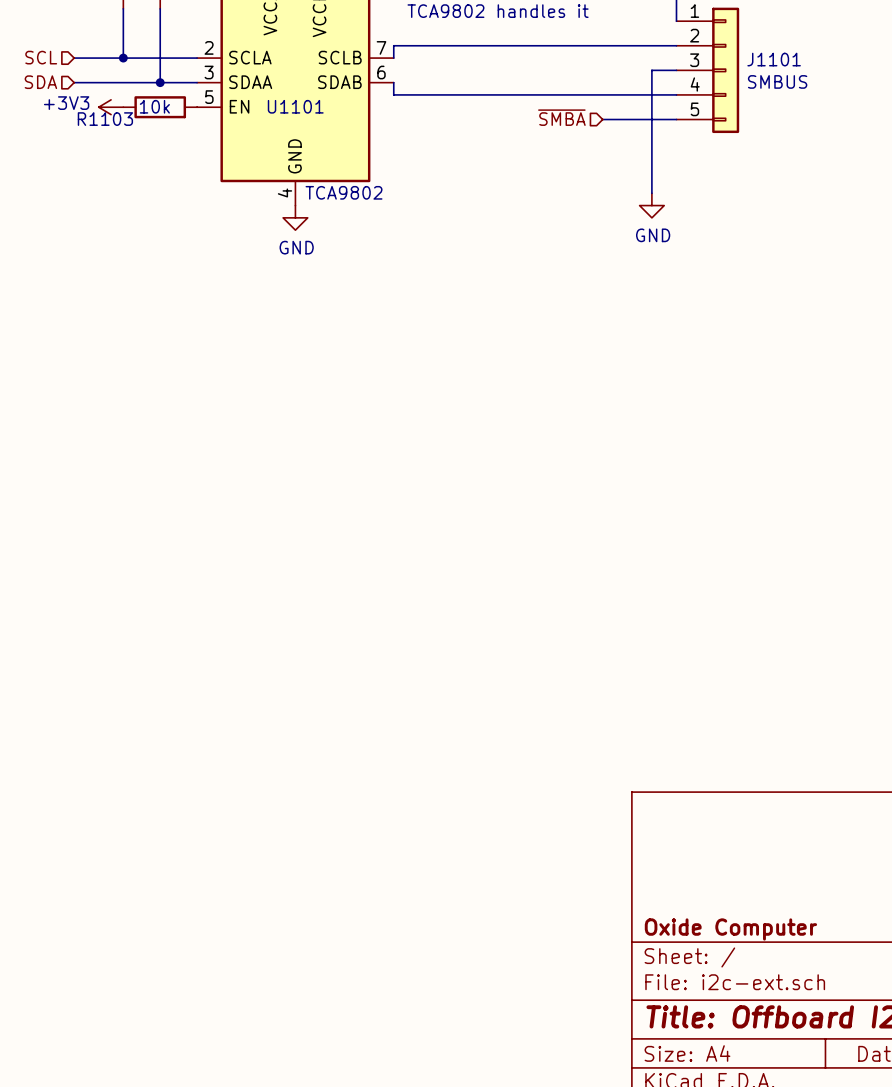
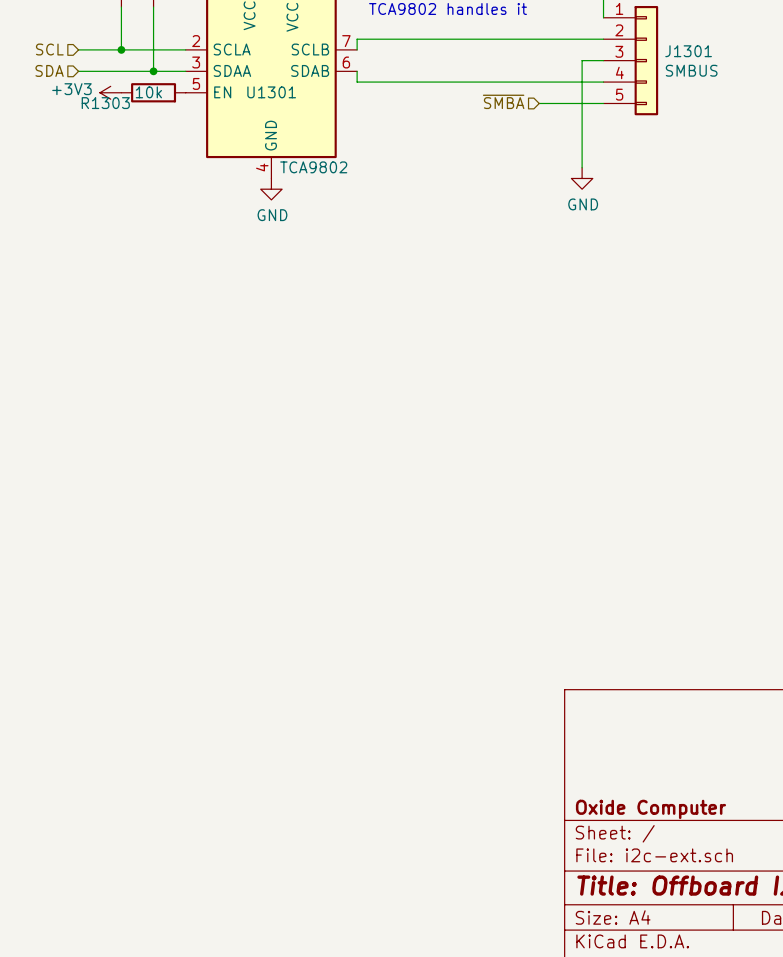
J1101 name: J1101 (774, 59) -> J1301 (688, 51)
U1101 name: U1101 (295, 106) -> U1301 (271, 92)
R1103 name: R1103 (105, 119) -> R1303 (105, 103)

